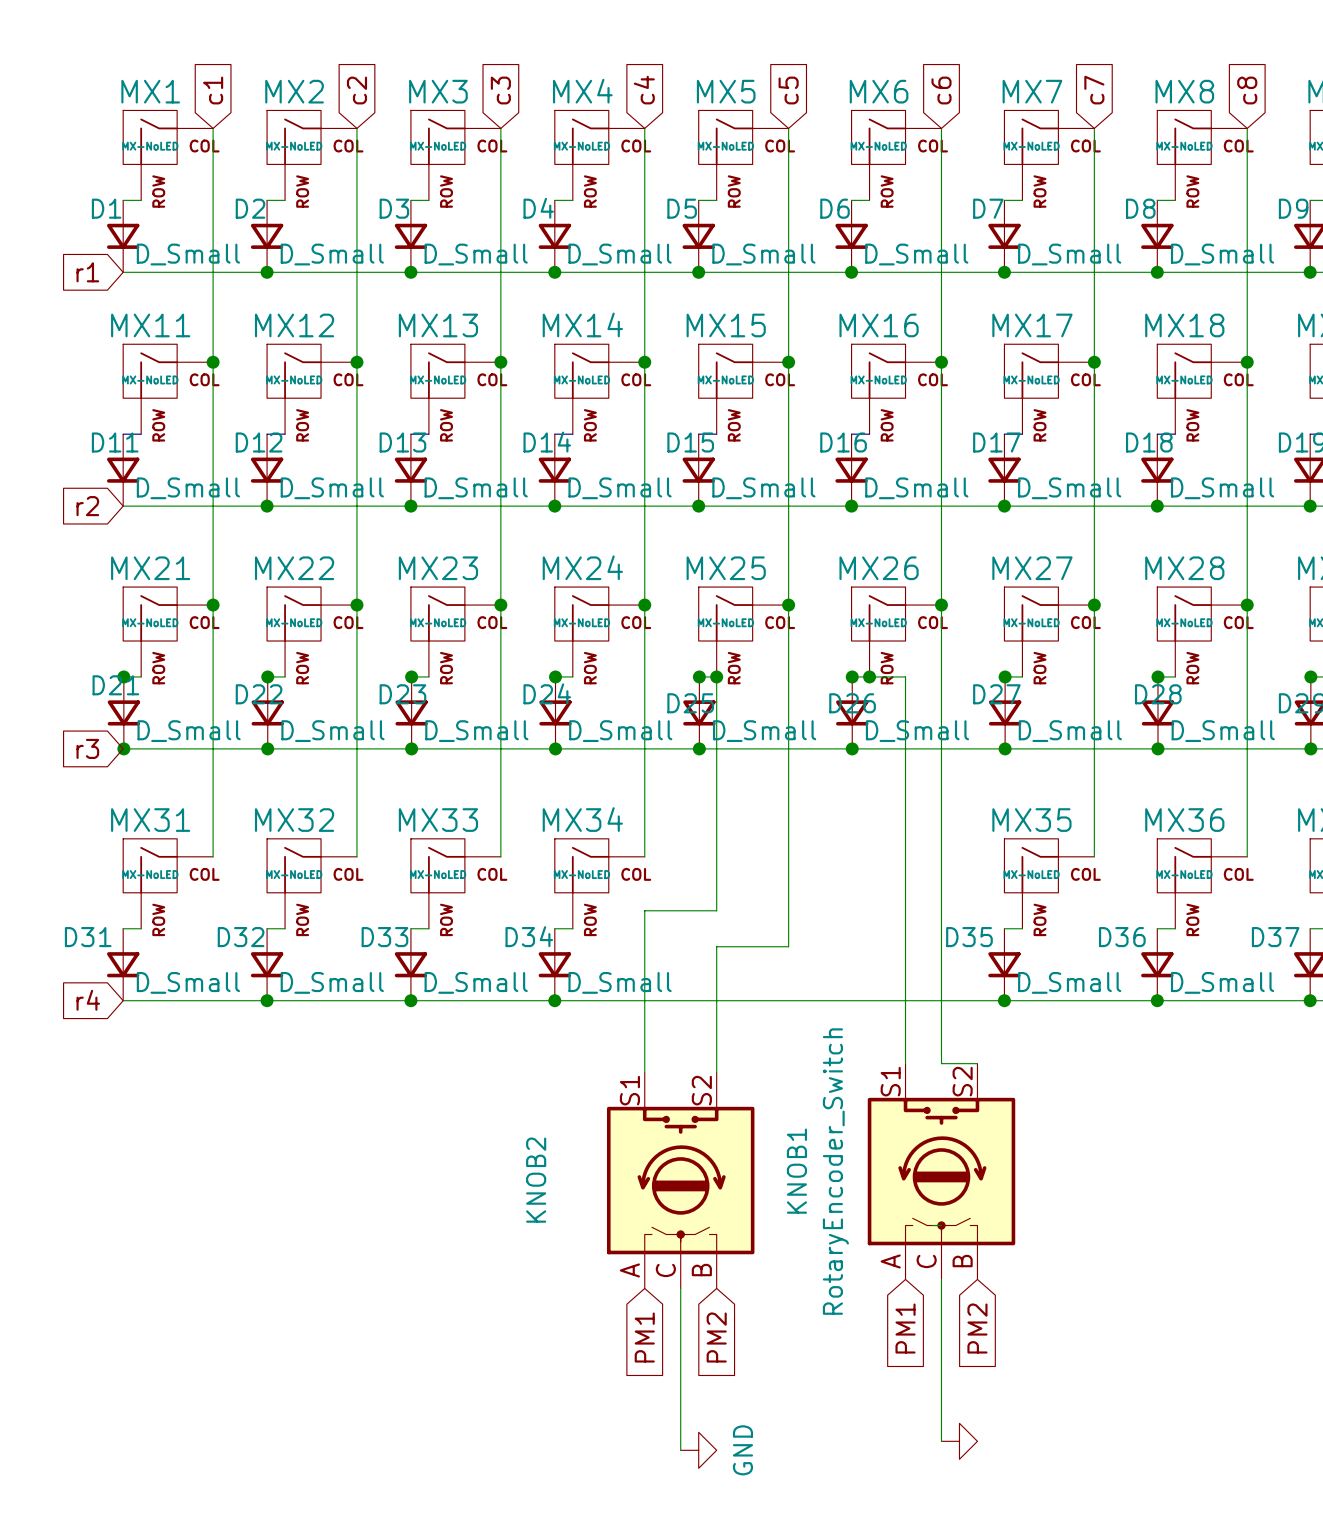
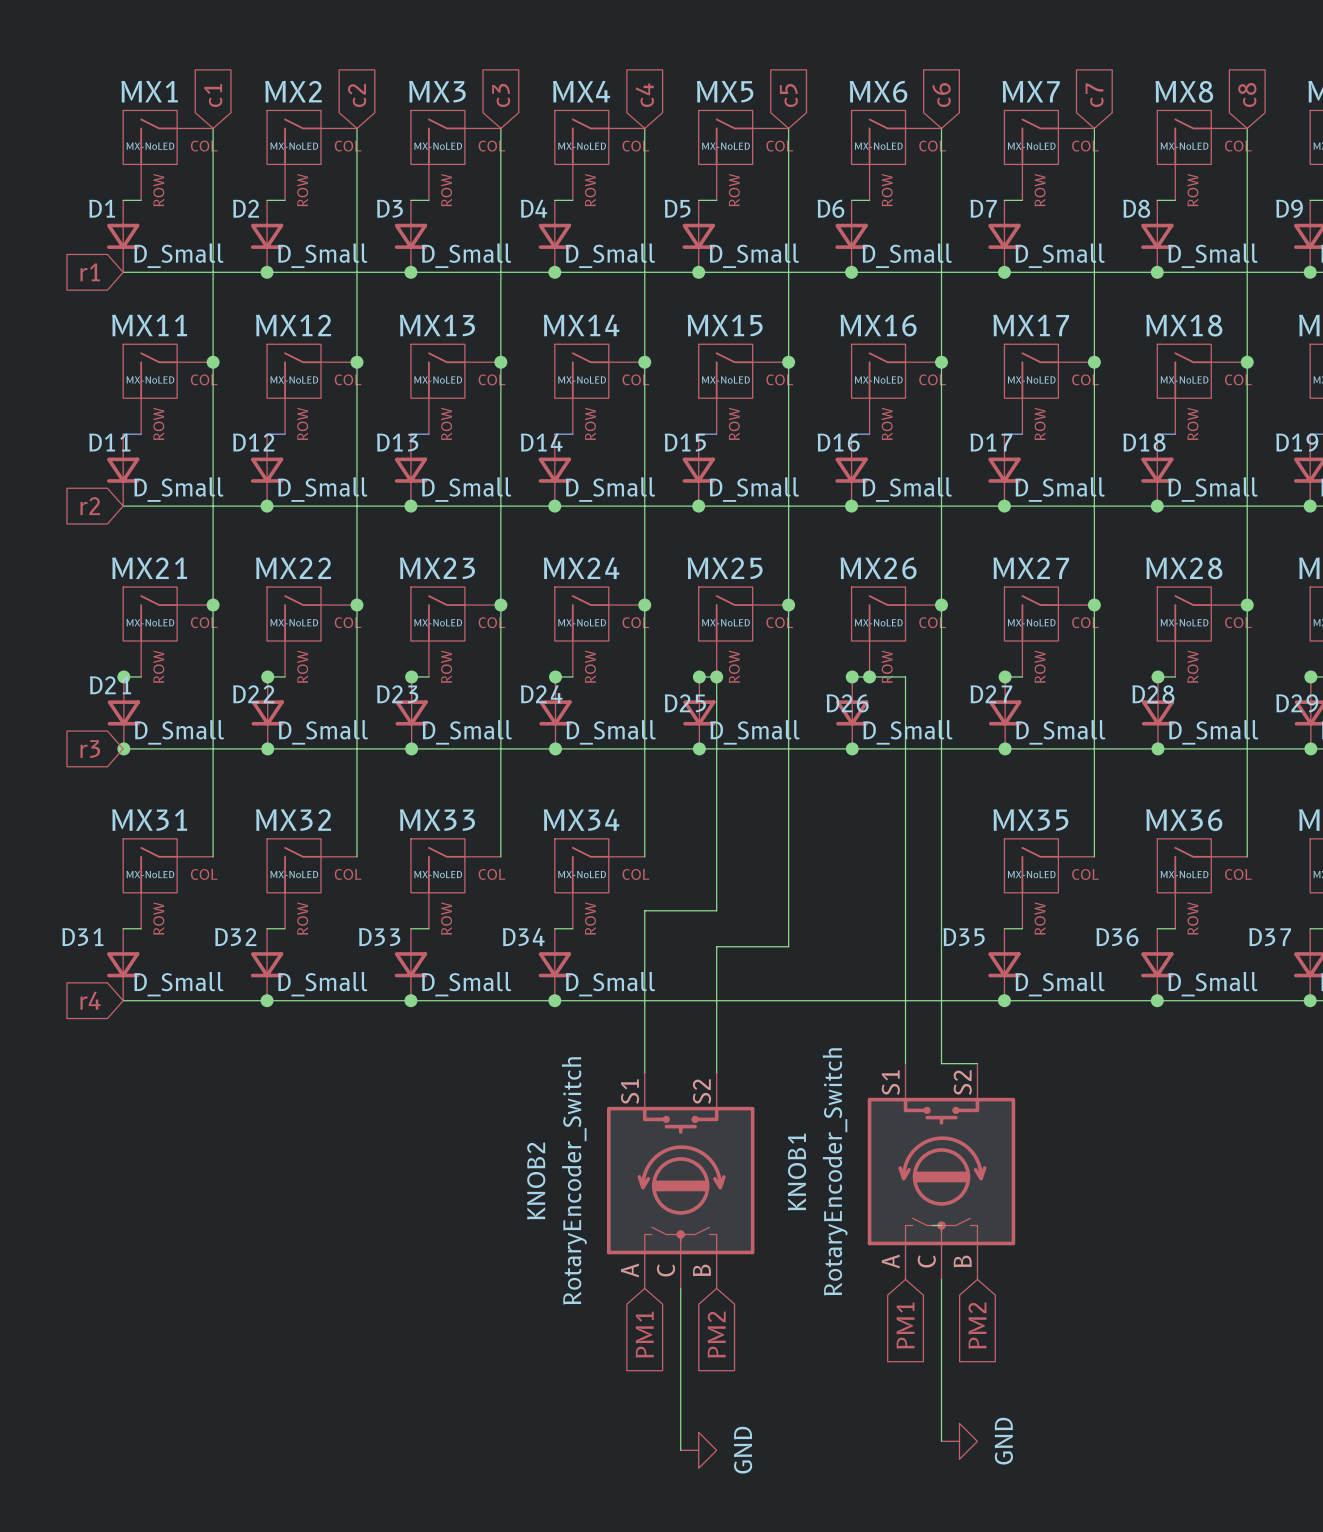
KNOB2 value: none -> RotaryEncoder_Switch (574, 1180)
power symbol text: none -> GND (1003, 1441)

